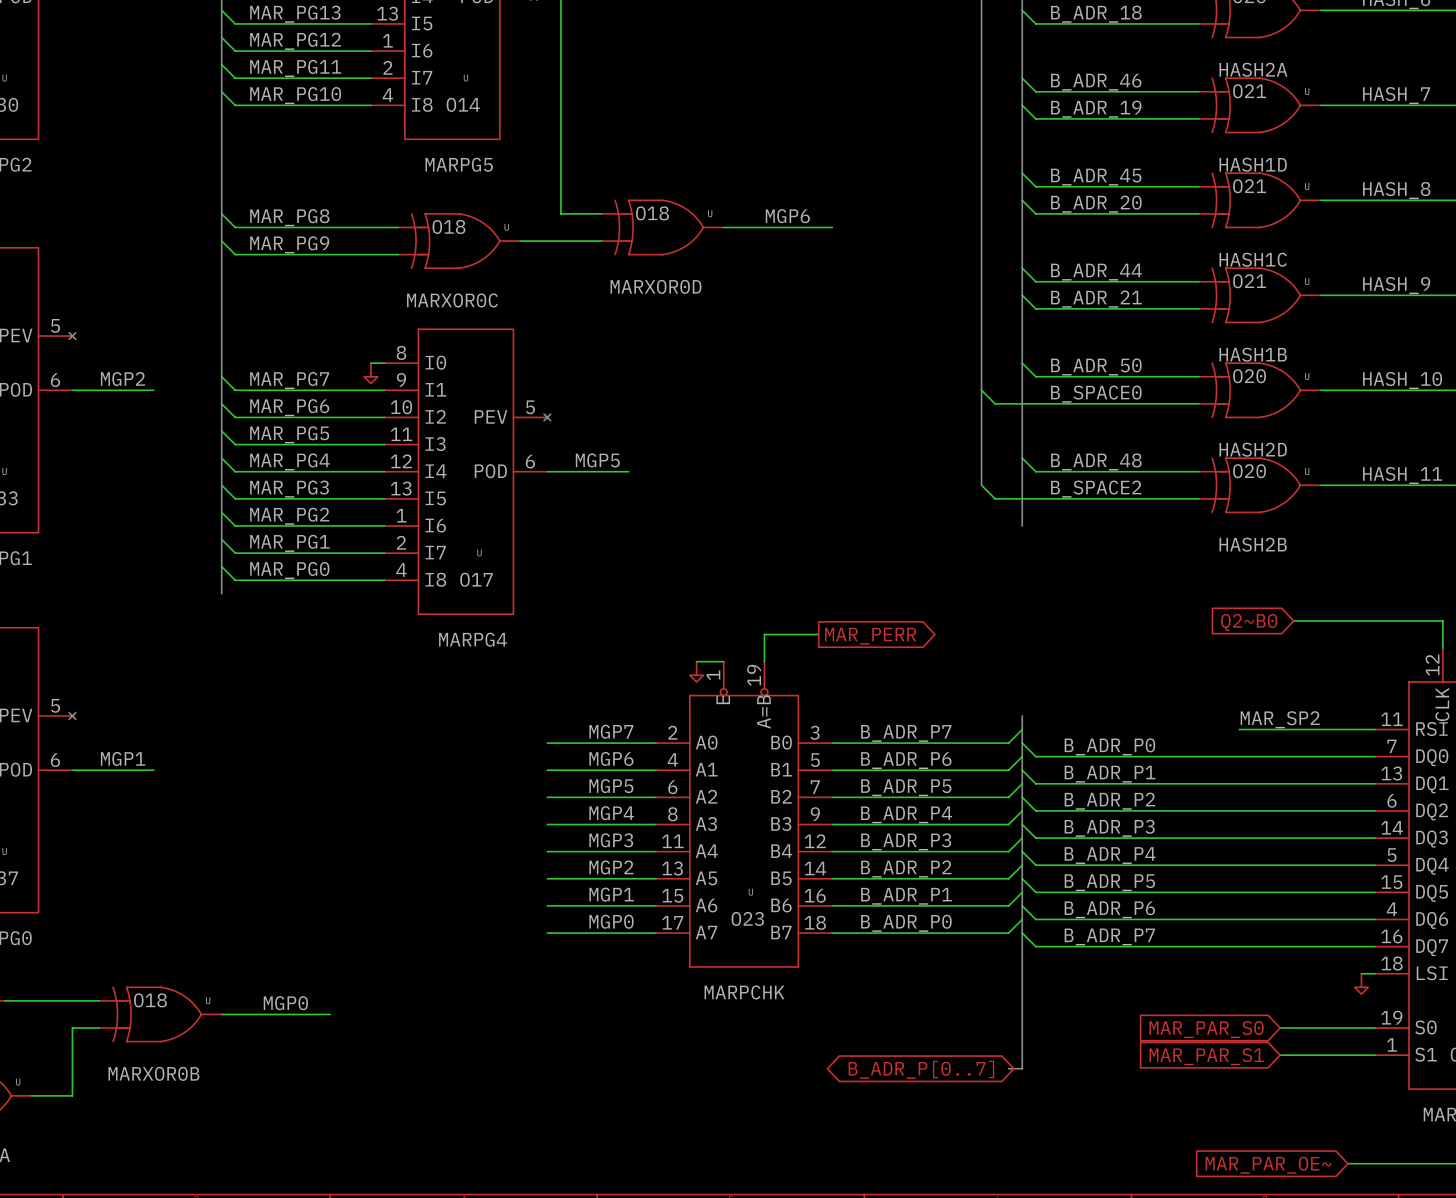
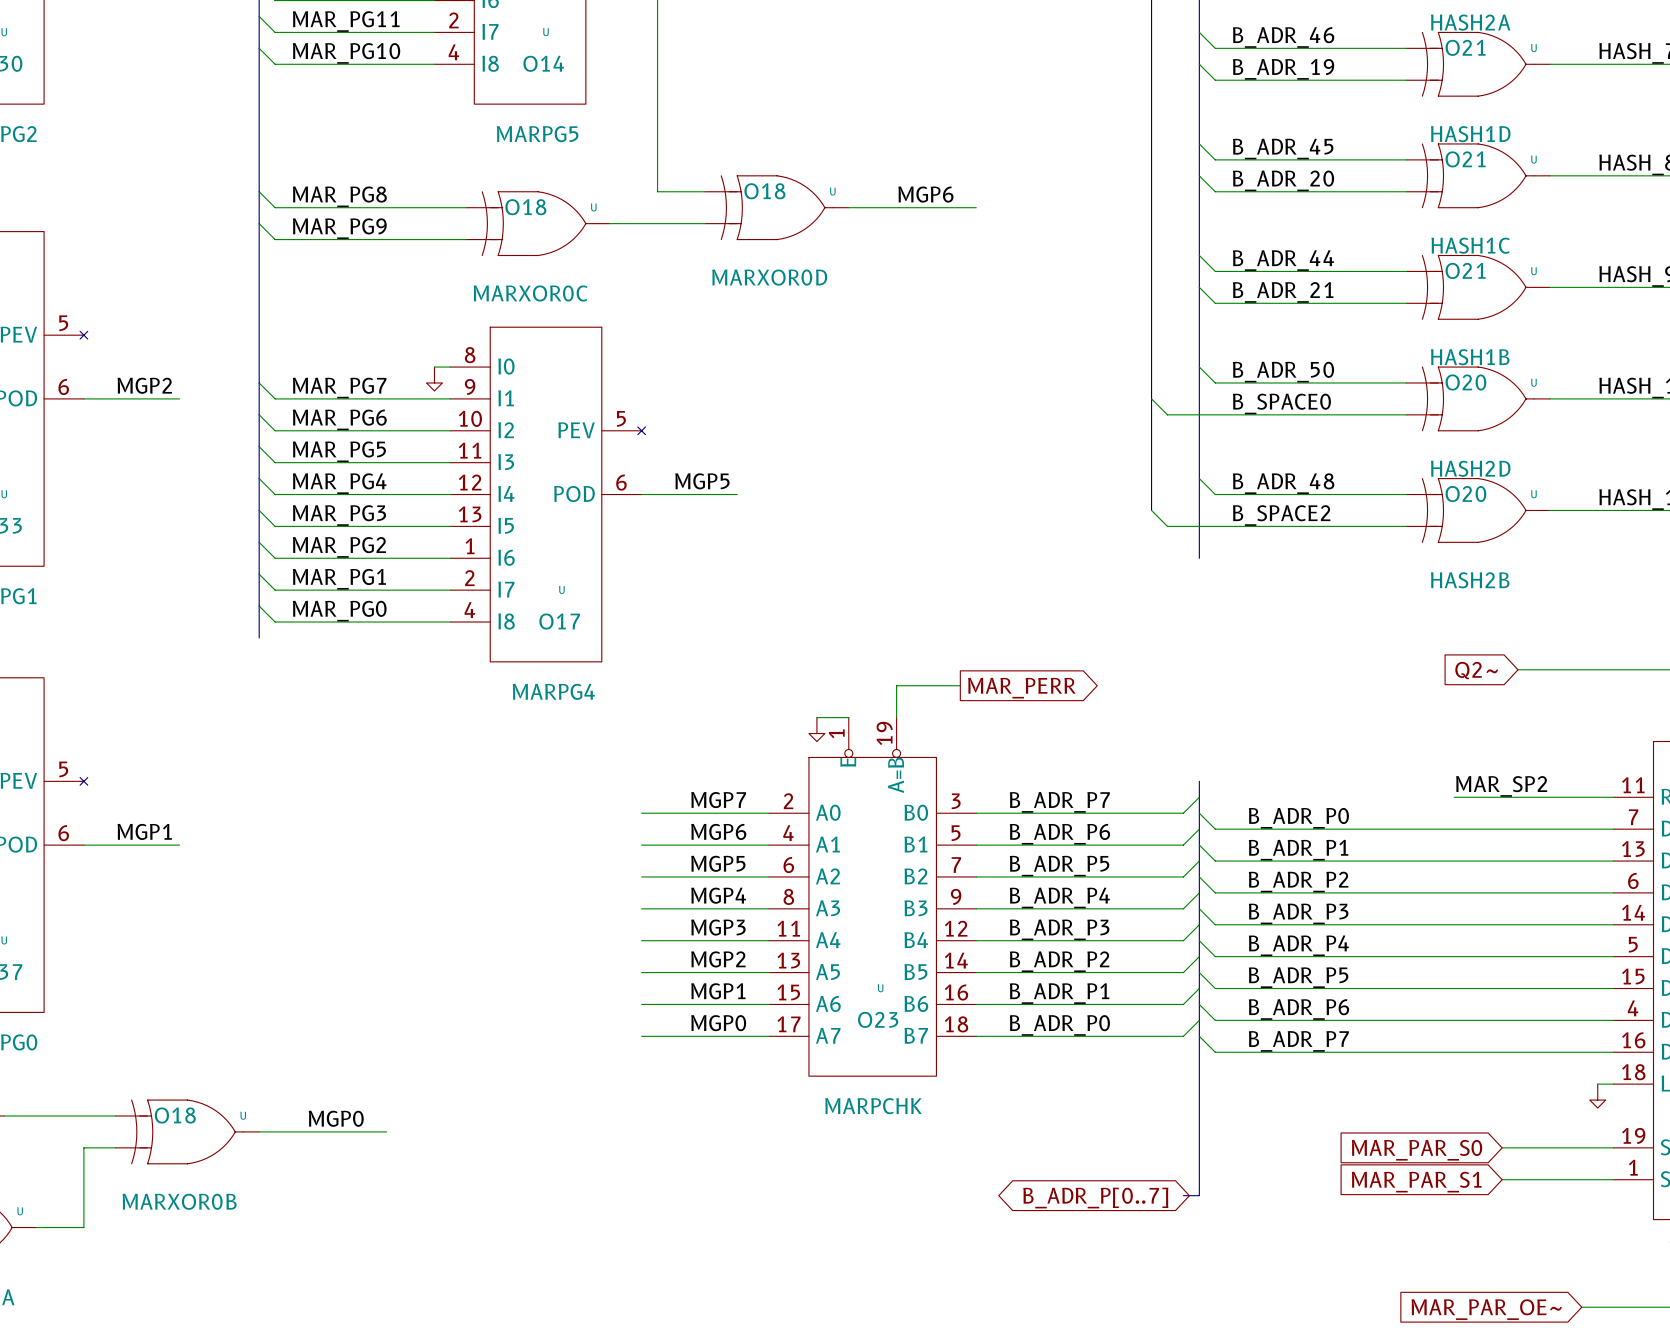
global label: Q2~B0 (1249, 622) -> Q2~ (1476, 670)

